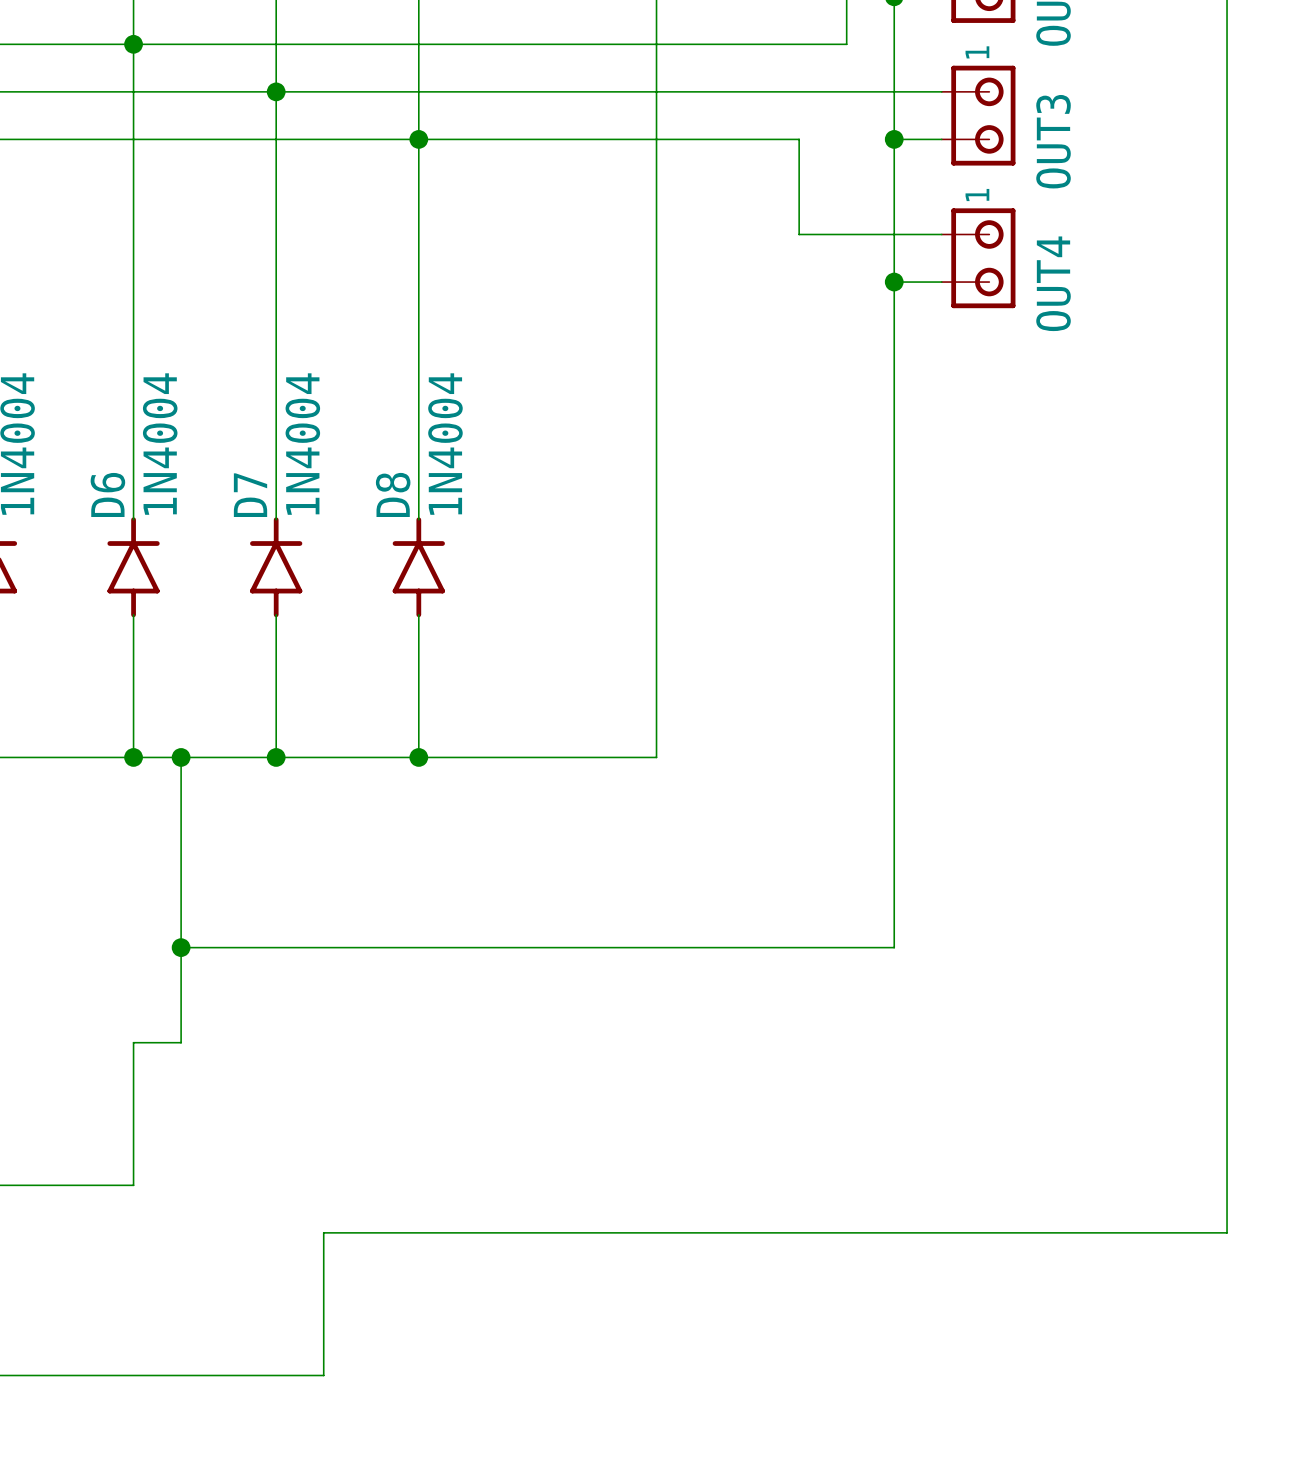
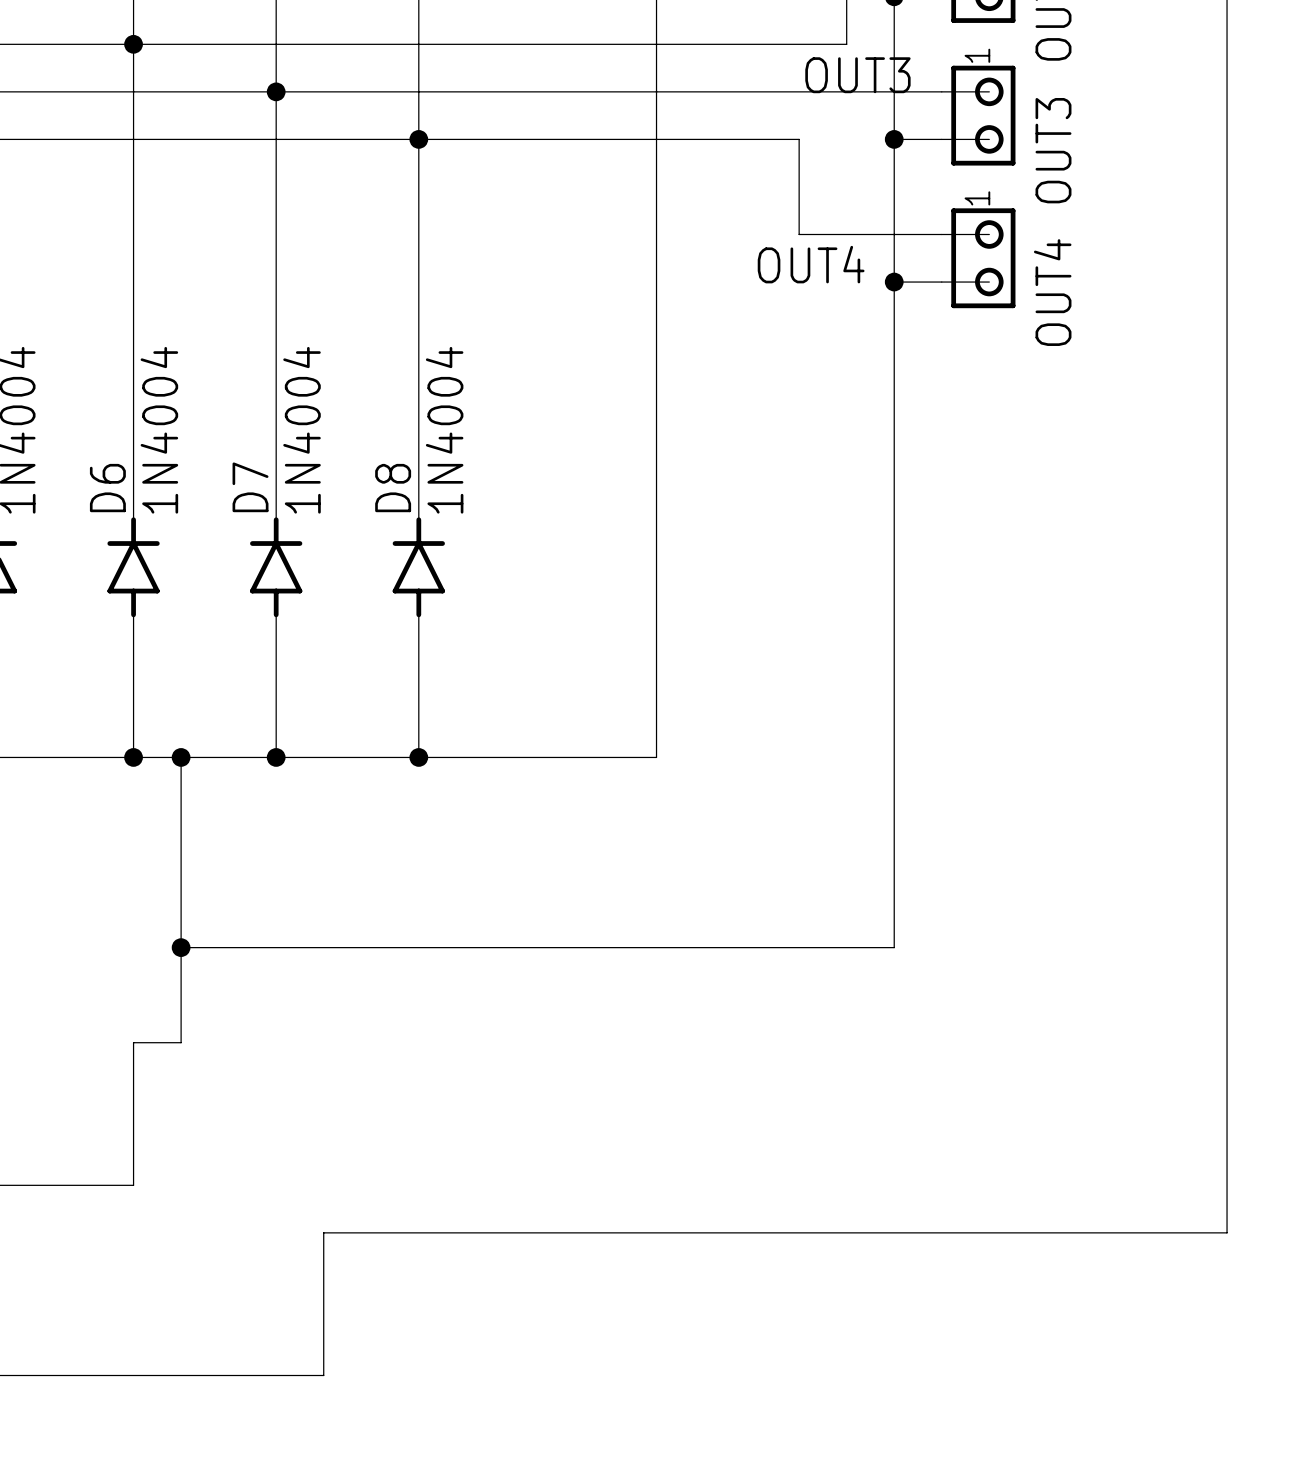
label: none -> OUT3 (857, 75)
label: none -> OUT4 (811, 264)

